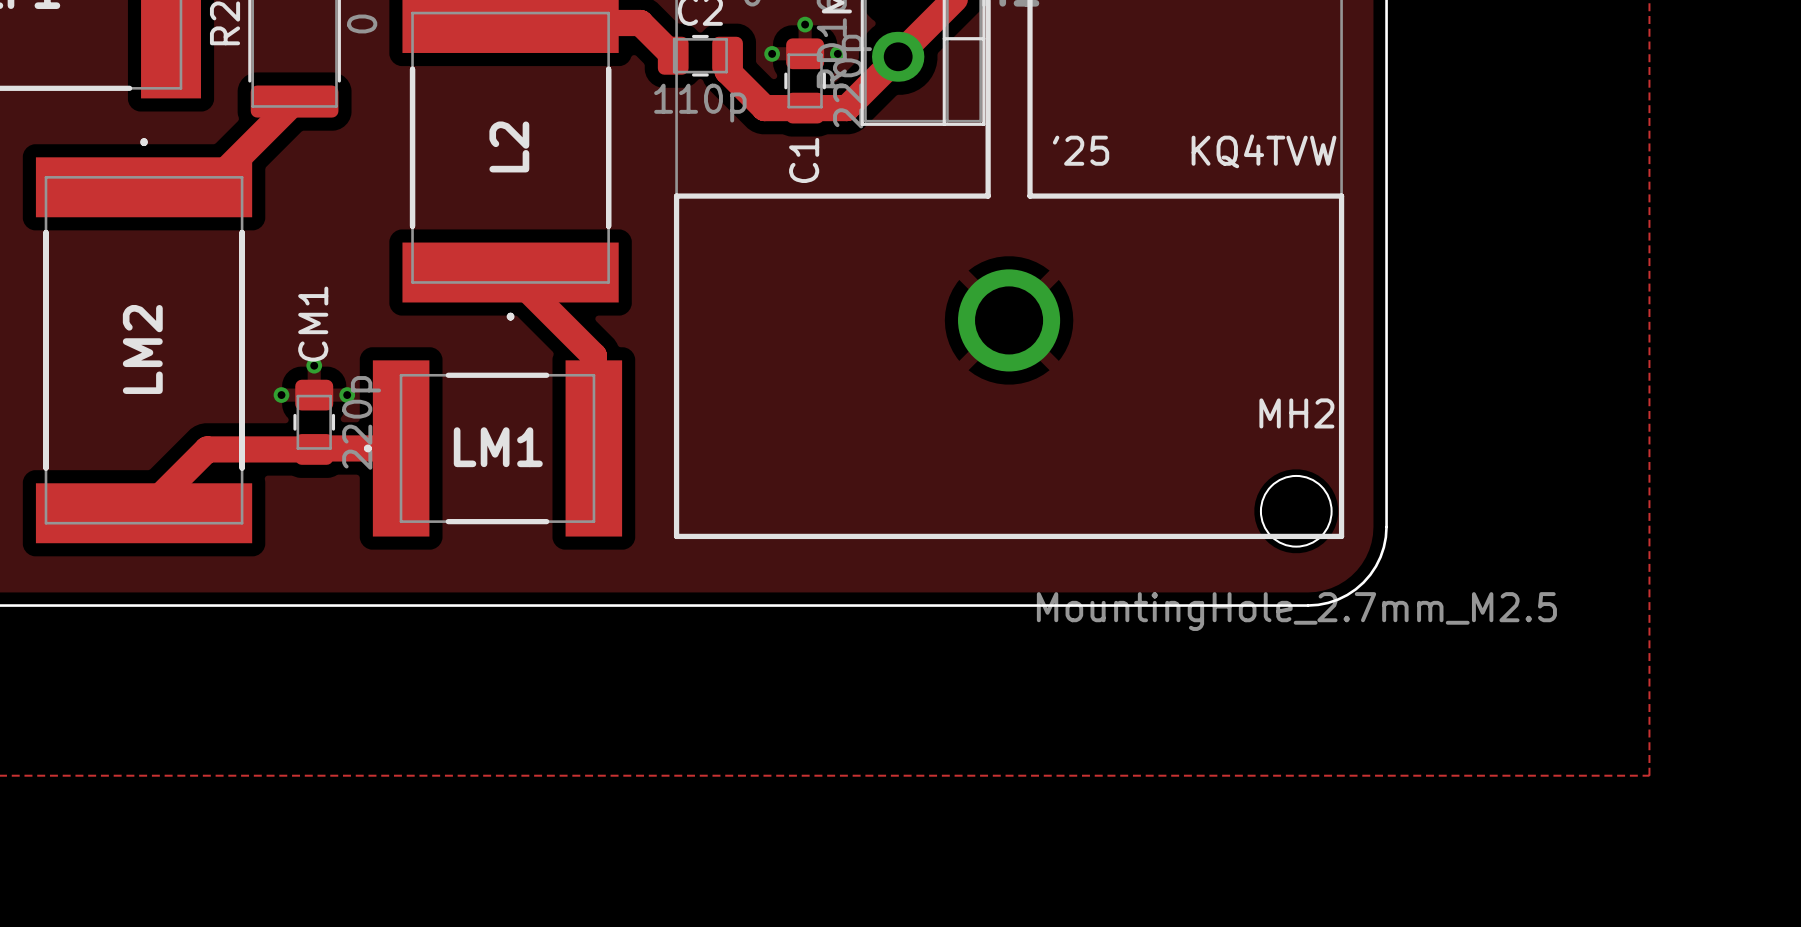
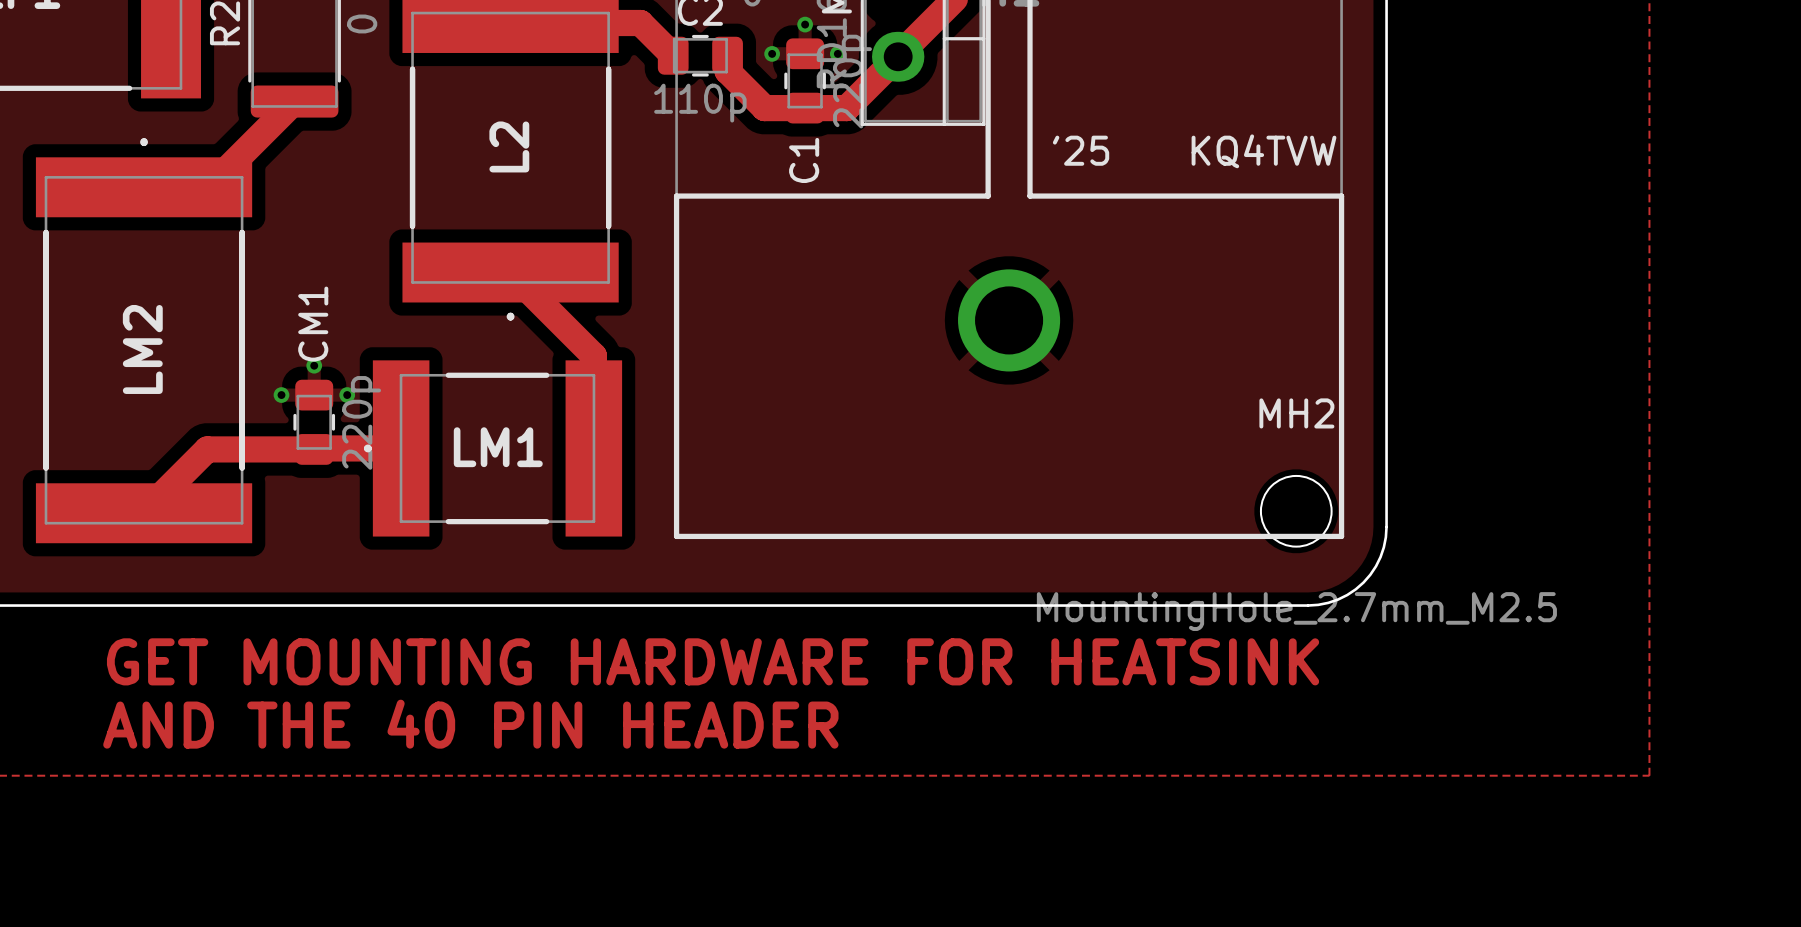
text: none -> GET MOUNTING HARDWARE FOR HEATSINK (713, 661)
text: none -> AND THE 40 PIN HEADER (470, 724)

